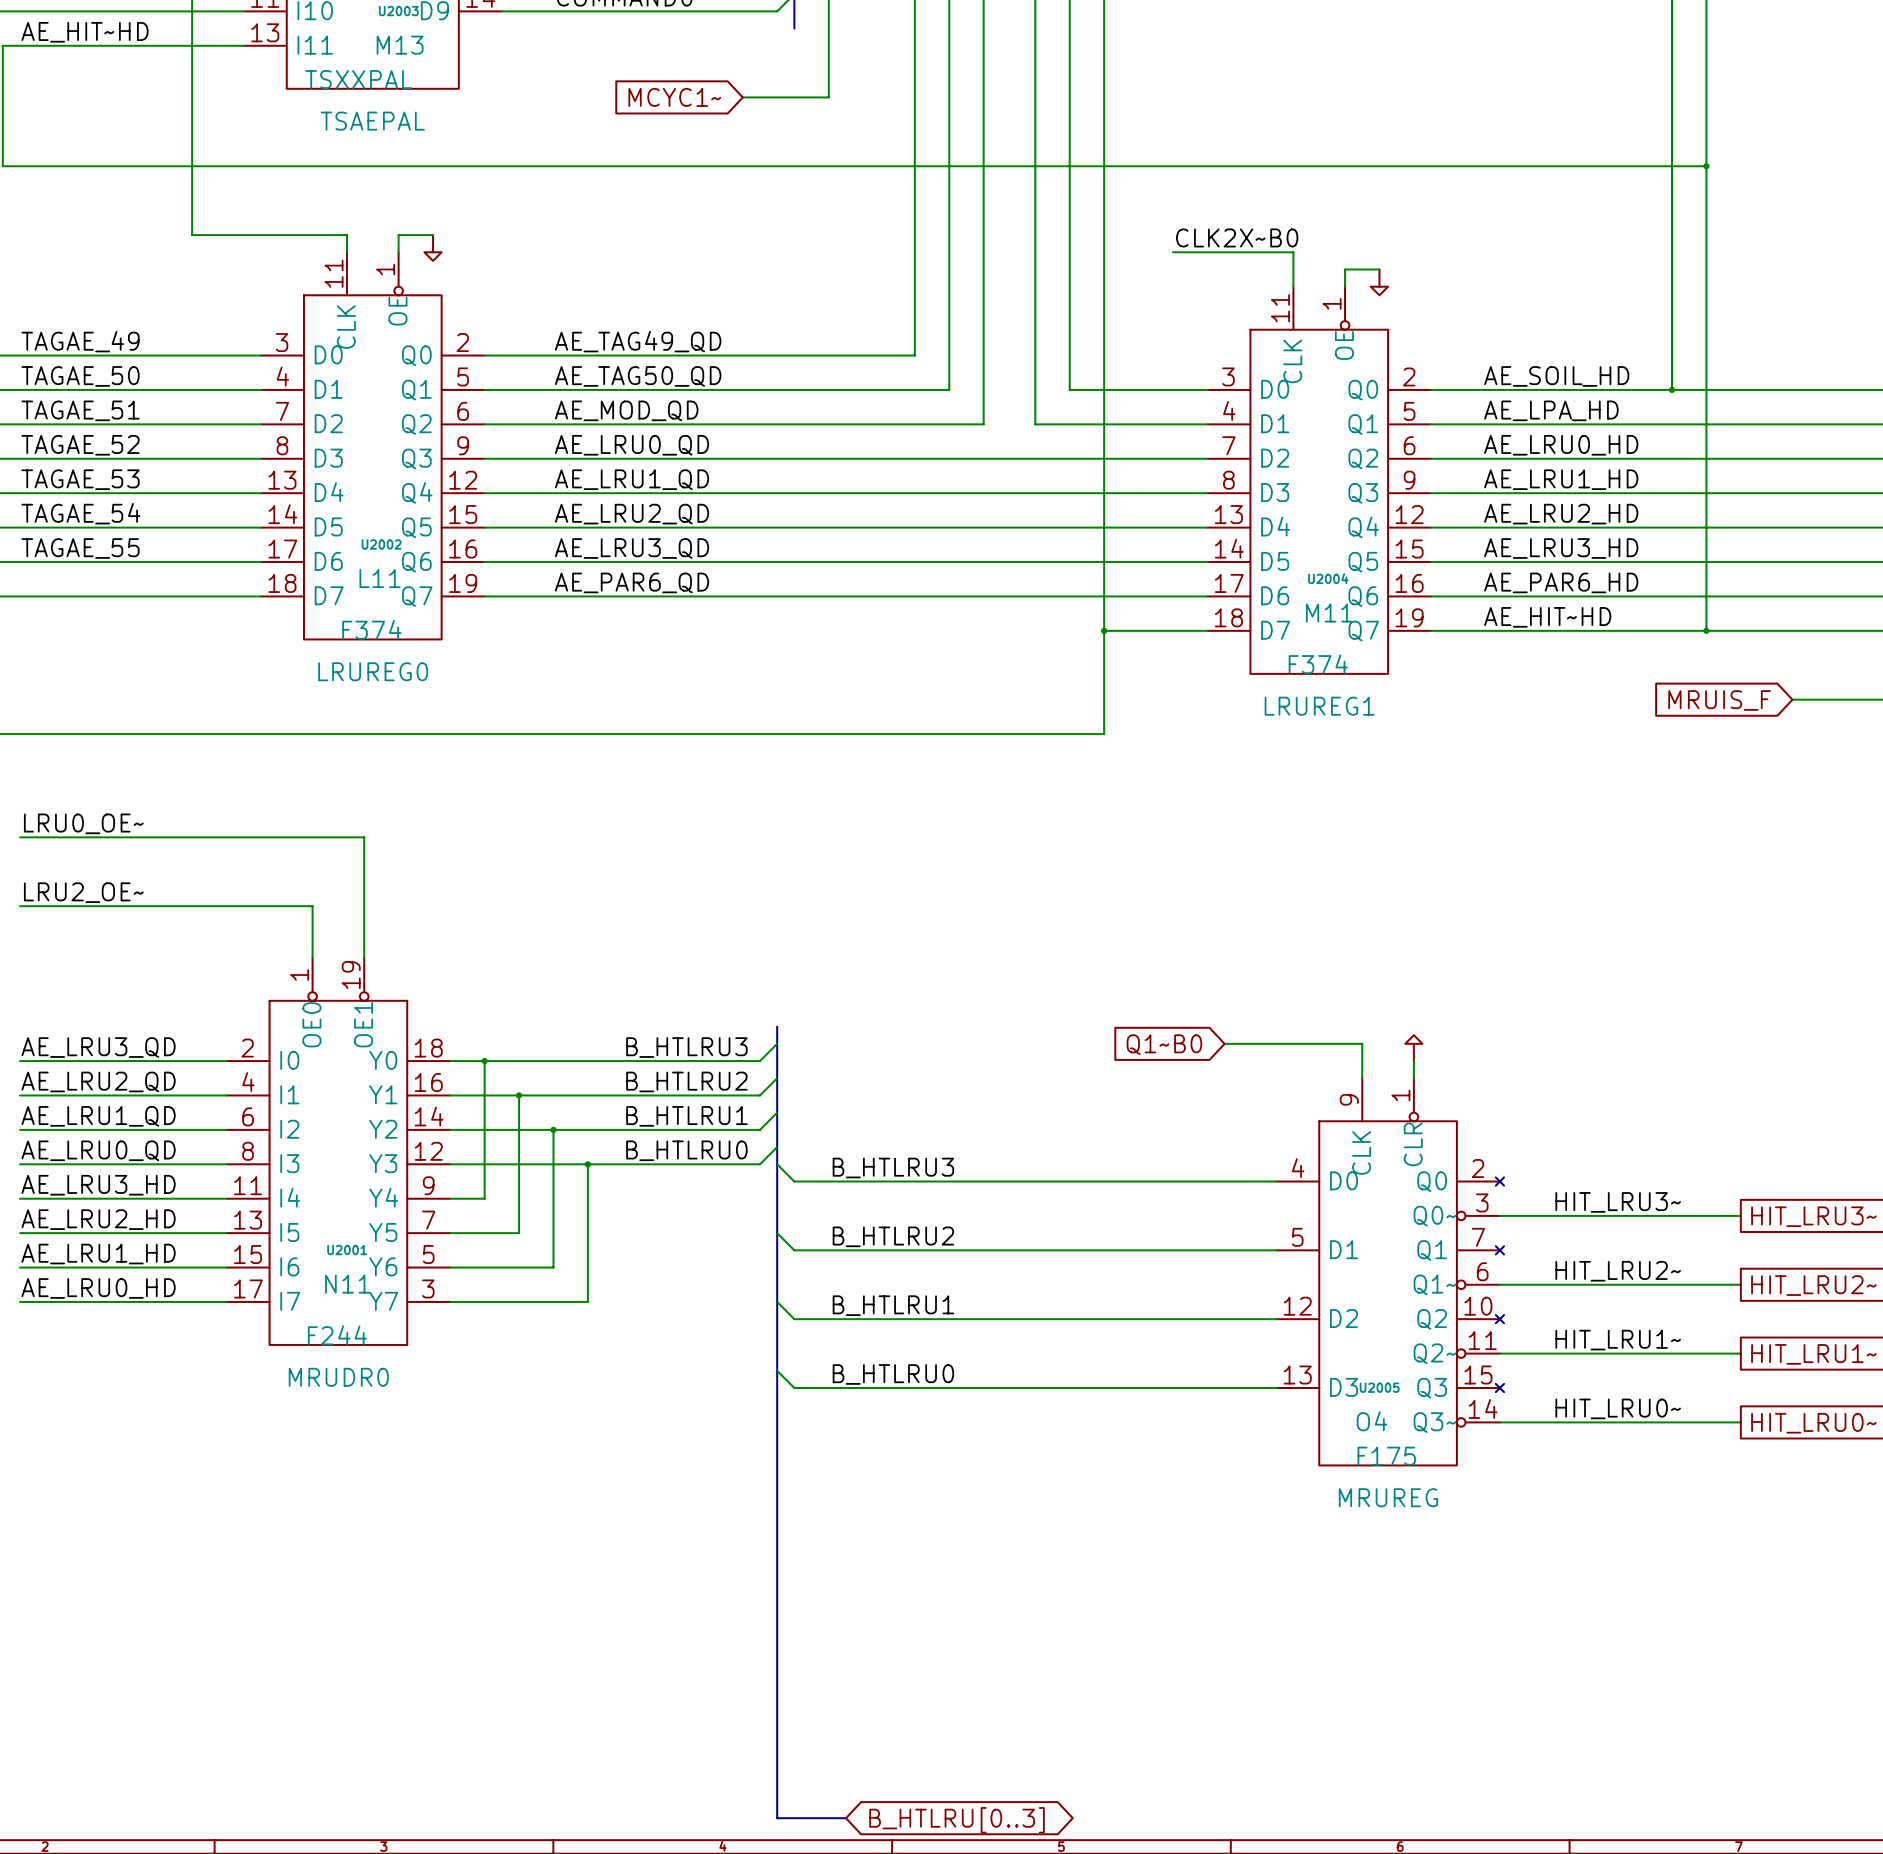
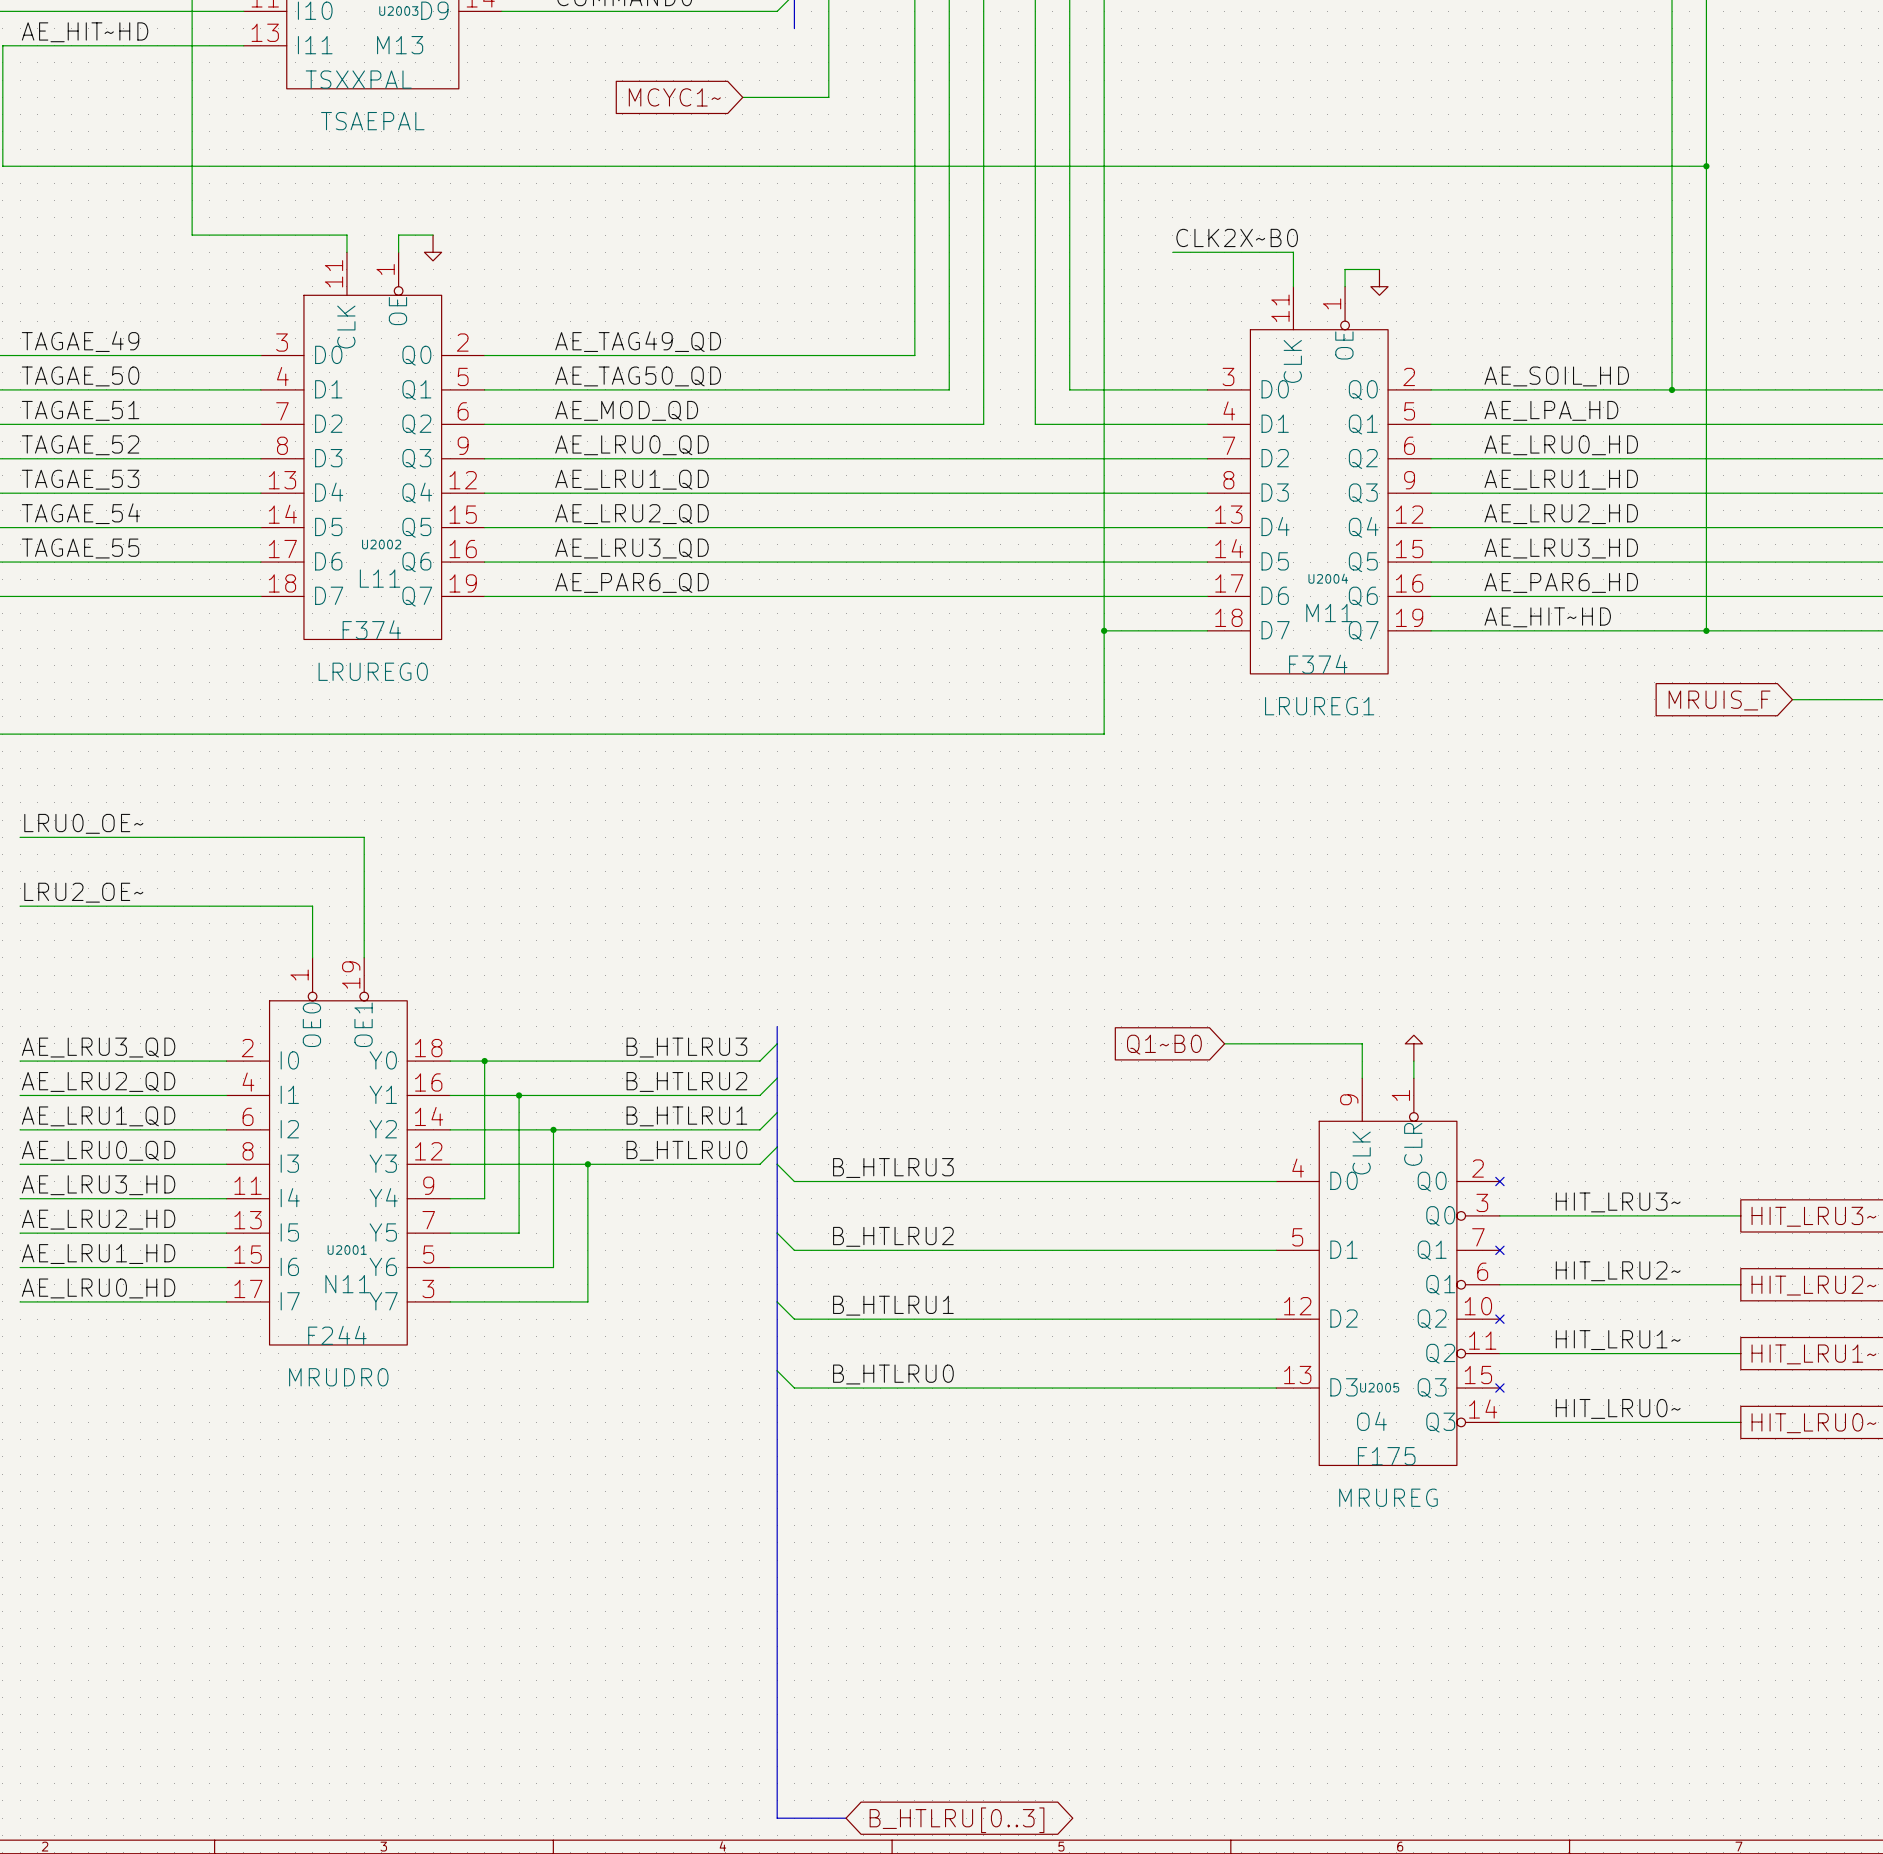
U2005 pin name: Q0~ (1434, 1216) -> Q0 (1440, 1216)
U2005 pin name: Q1~ (1434, 1284) -> Q1 (1440, 1284)
U2005 pin name: Q2~ (1434, 1353) -> Q2 (1440, 1353)
U2005 pin name: Q3~ (1434, 1422) -> Q3 (1440, 1422)

